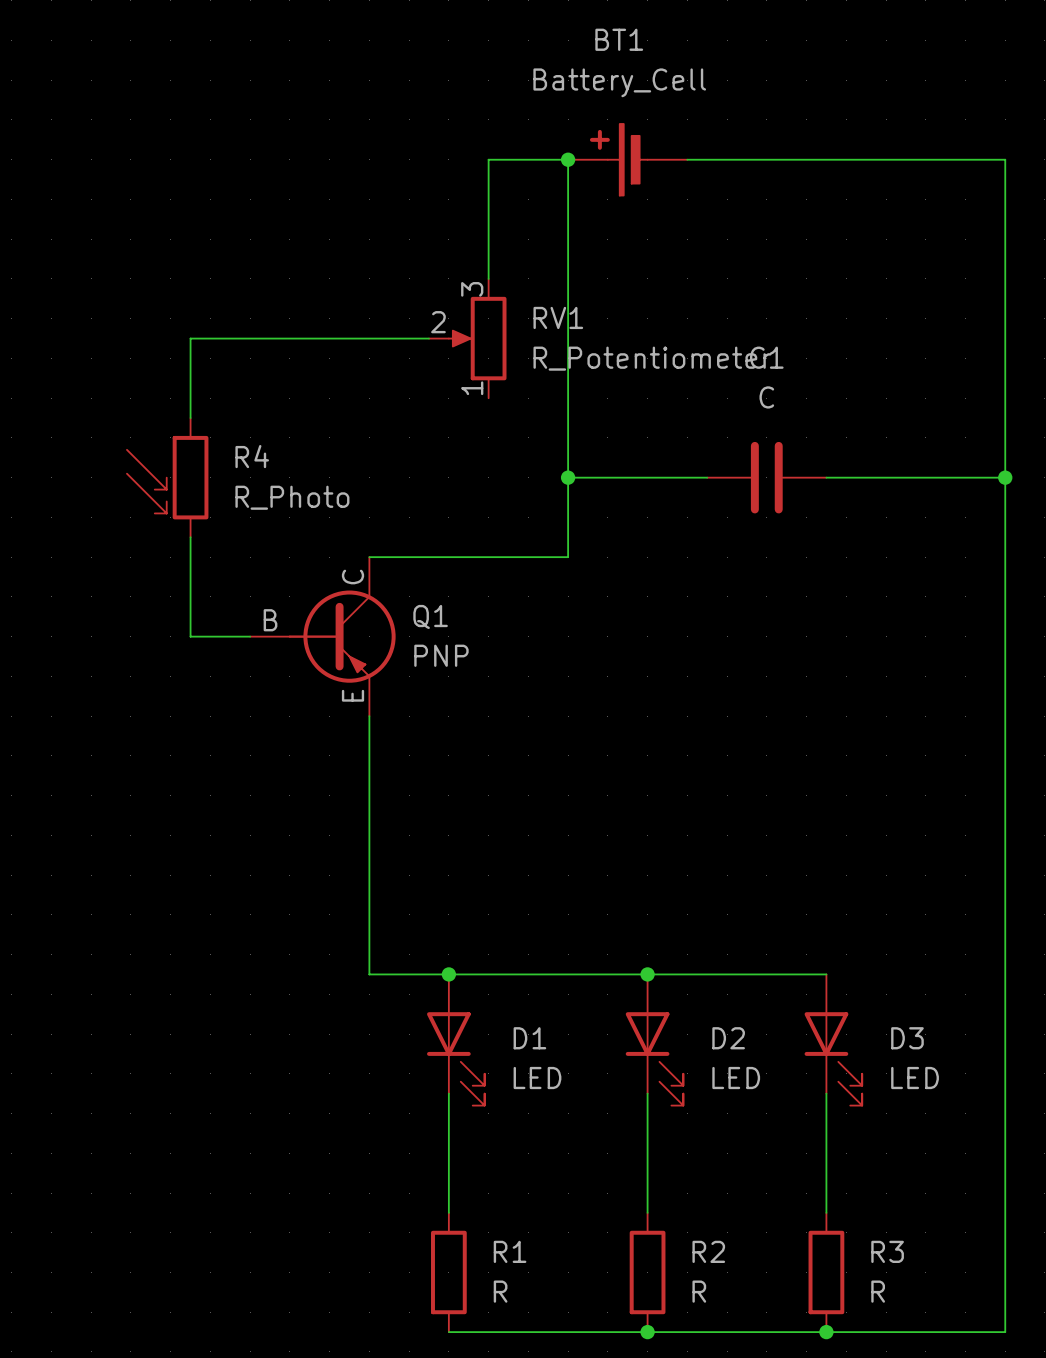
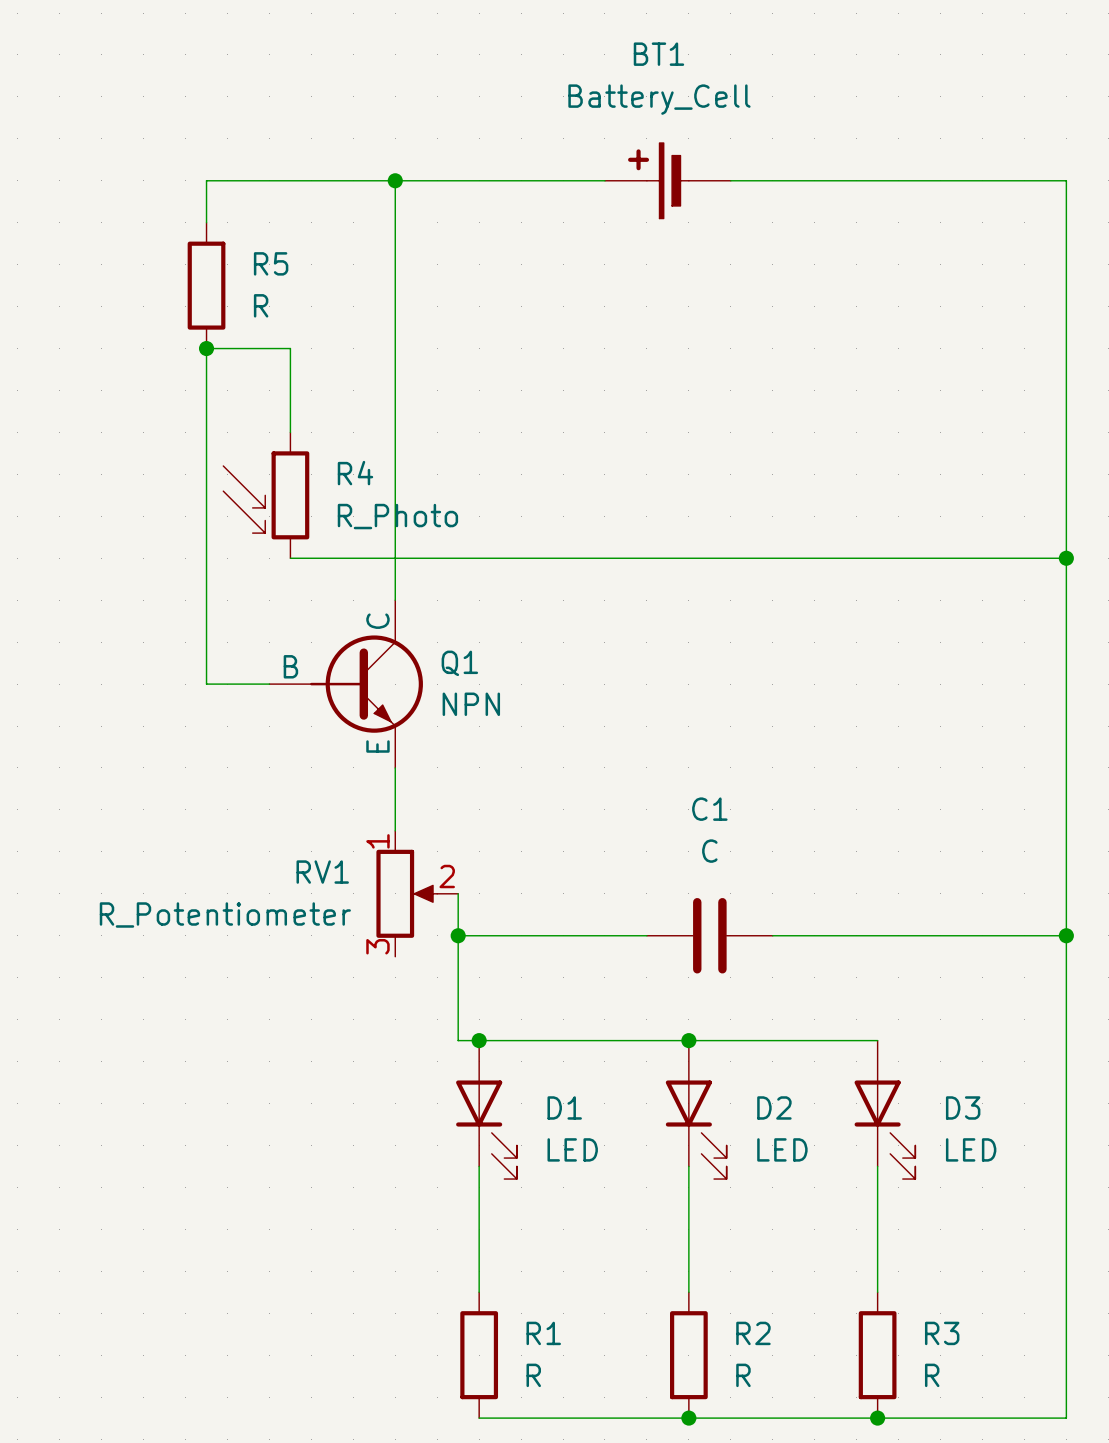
junction: none -> (395, 180)
wire: (488, 159) (488, 278) -> (521, 180) (206, 180) (206, 222)
wire: (568, 159) (568, 557) (369, 557) -> (395, 180) (395, 600)
junction: (568, 159) -> none
R5: none -> R (206, 285)
RV1 name position: RV1 (558, 317) -> RV1 (322, 872)
junction: none -> (206, 348)
wire: (190, 338) (429, 338) -> (206, 369) (206, 348) (290, 348) (290, 432)
RV1 position: (467, 338) -> (417, 893)
RV1 rotation: 0° (477, 338) -> 180° (406, 893)
RV1 value position: R_Potentiometer (652, 358) -> R_Potentiometer (225, 914)
wire: none -> (206, 453) (206, 579)
R4 position: (167, 477) -> (266, 495)
wire: (568, 477) (707, 477) -> none
junction: (568, 477) -> none
C1 position: (766, 477) -> (709, 935)
wire: (826, 477) (1005, 477) -> none
junction position: (1005, 477) -> (1066, 558)
wire: none -> (290, 558) (1066, 558)
Q1 symbol: [250, 557, 396, 717] -> [269, 600, 423, 768]
Q1 value: PNP (441, 655) -> NPN (471, 704)
wire: (369, 775) (369, 974) (429, 974) -> (458, 893) (458, 1040)
wire: none -> (458, 935) (646, 935)
junction: none -> (458, 935)
wire: none -> (772, 935) (1066, 935)
junction: none -> (1066, 935)

